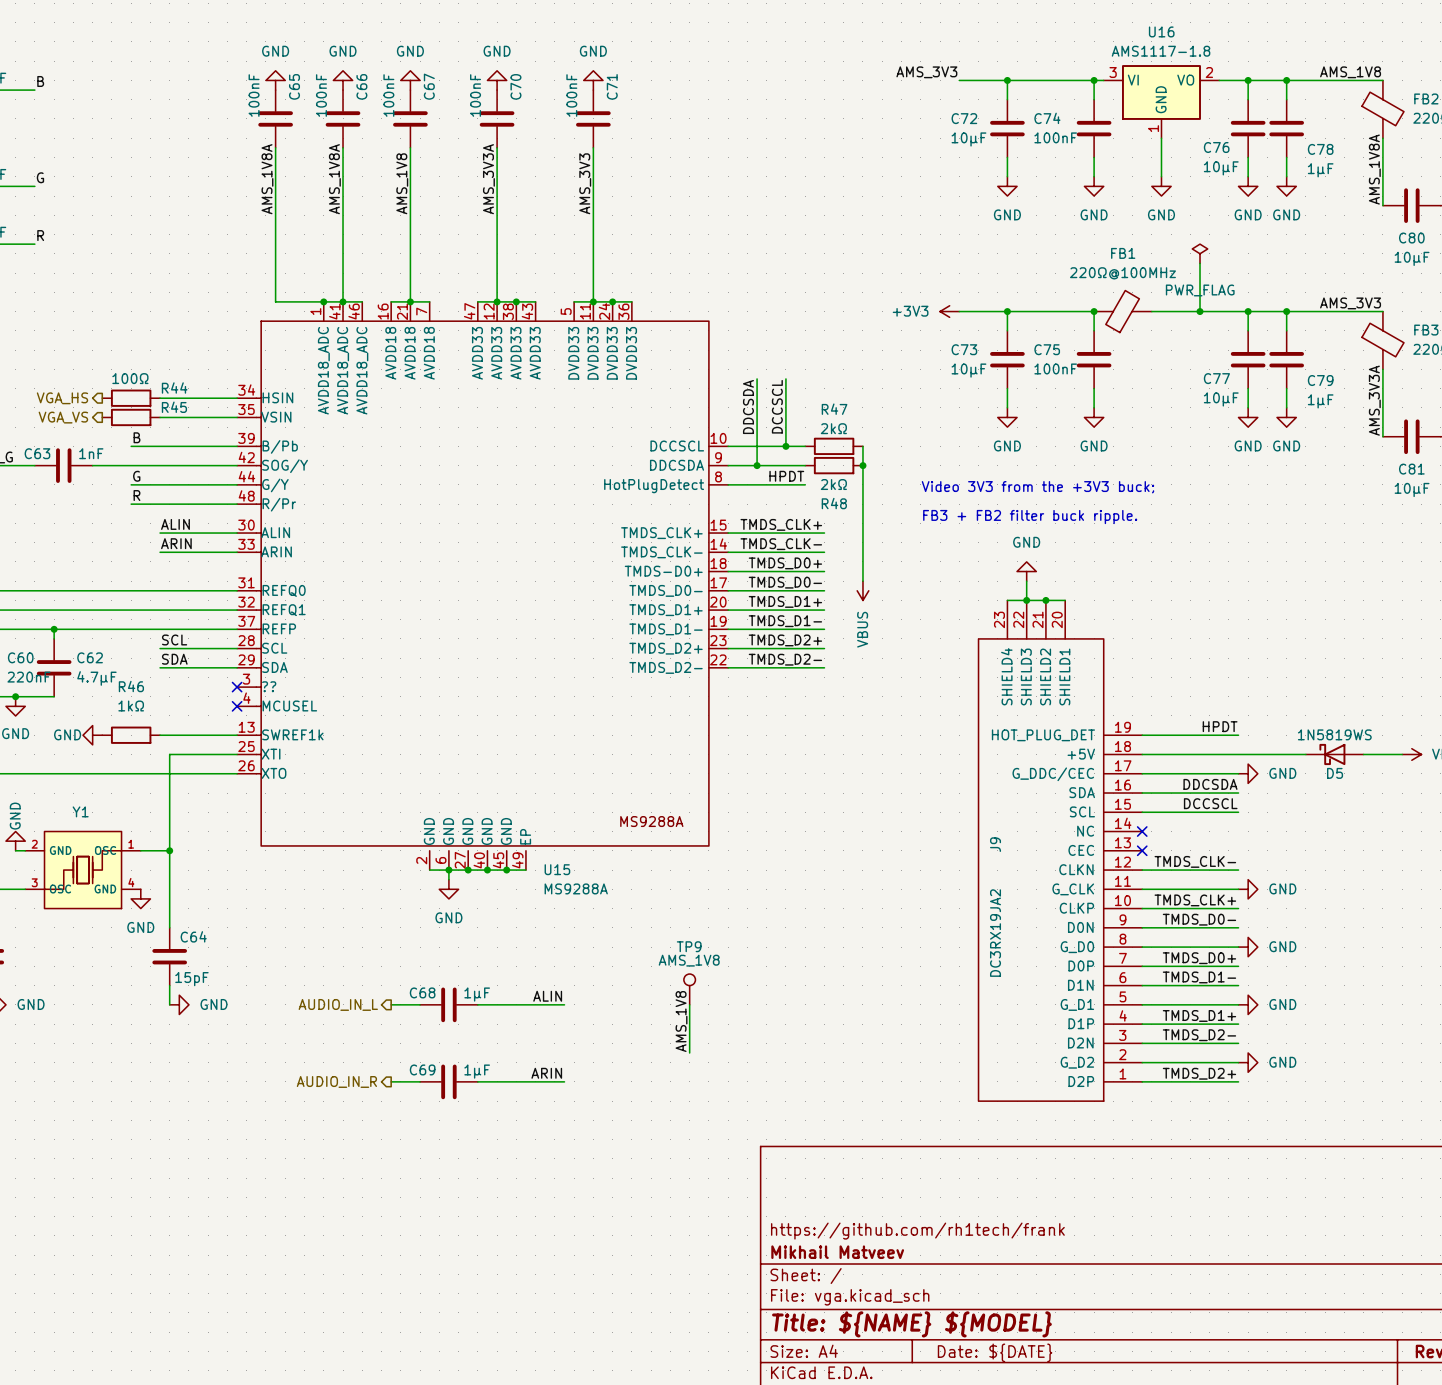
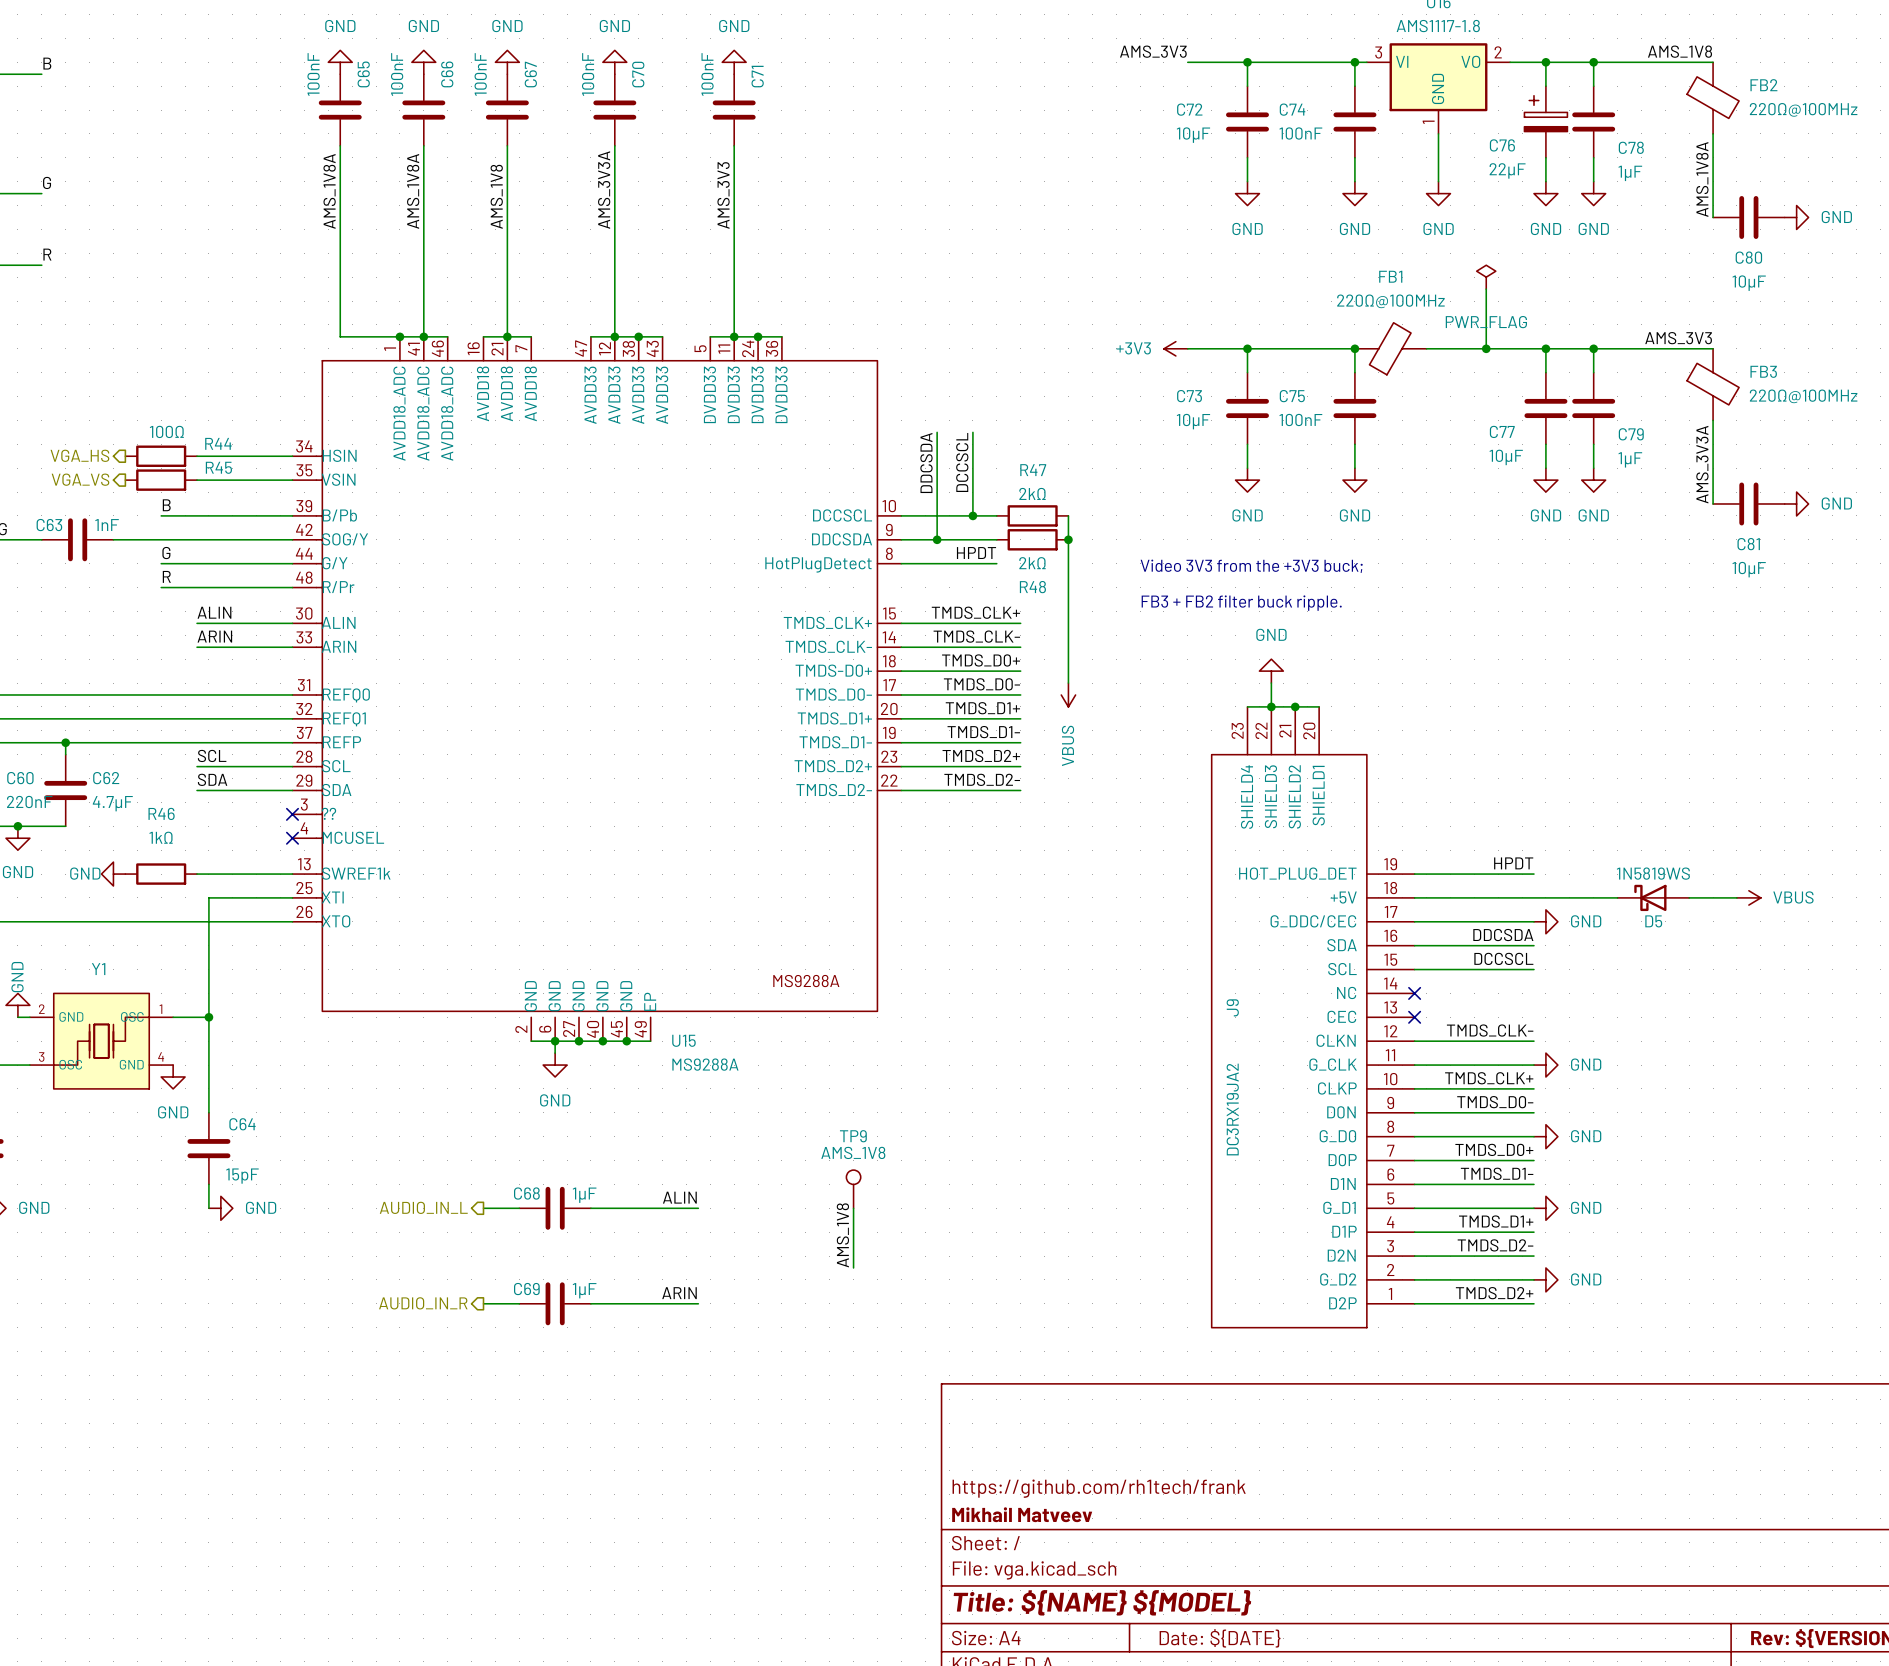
C76 symbol: [1230, 99, 1266, 158] -> [1524, 86, 1568, 158]
C76 value: 10µF (1221, 168) -> 22µF (1507, 170)

